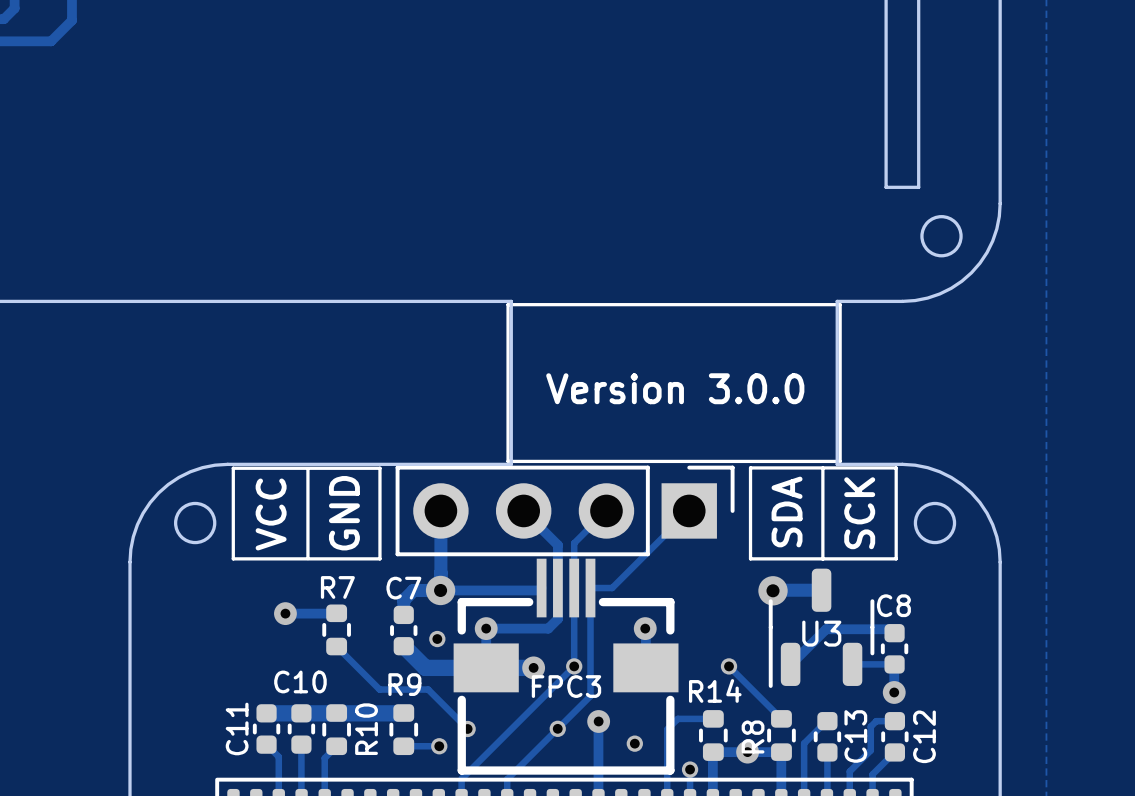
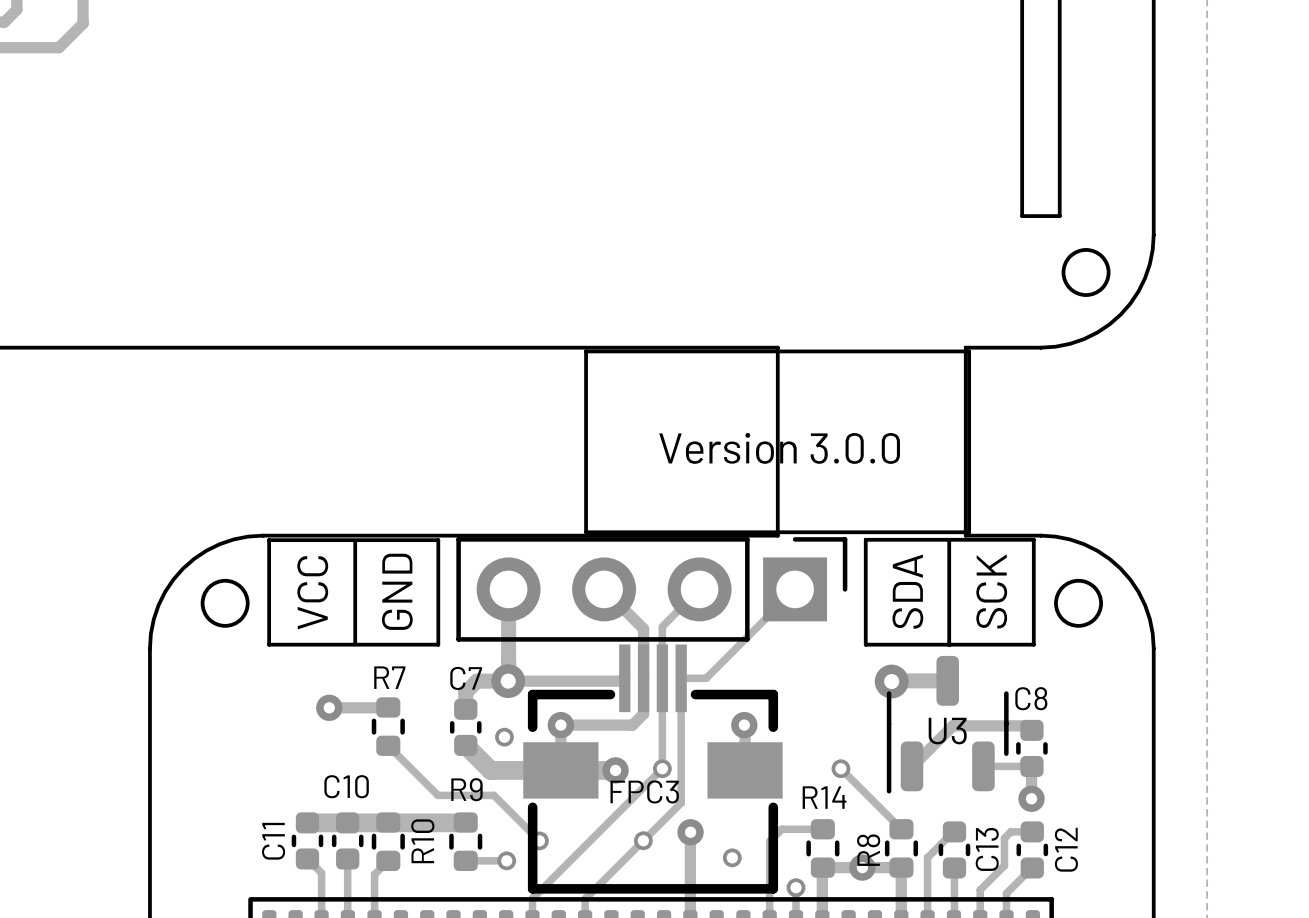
board edge: (511, 301) (511, 464) -> (589, 347) (777, 347) (777, 535) (589, 535)

